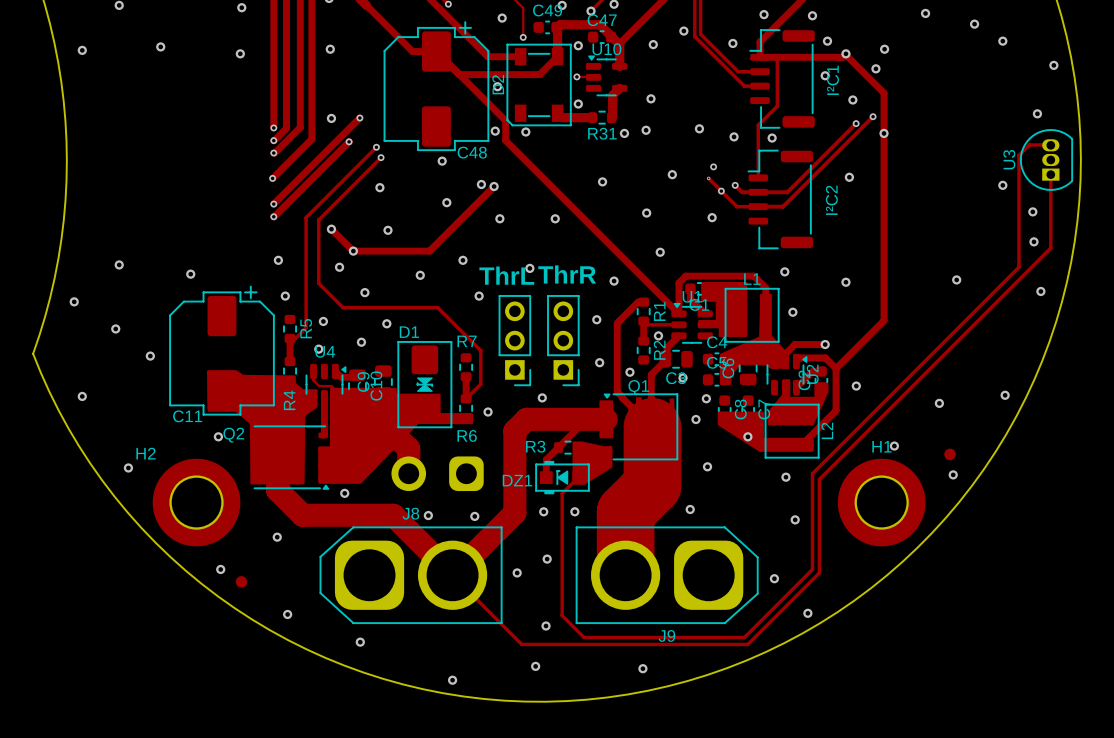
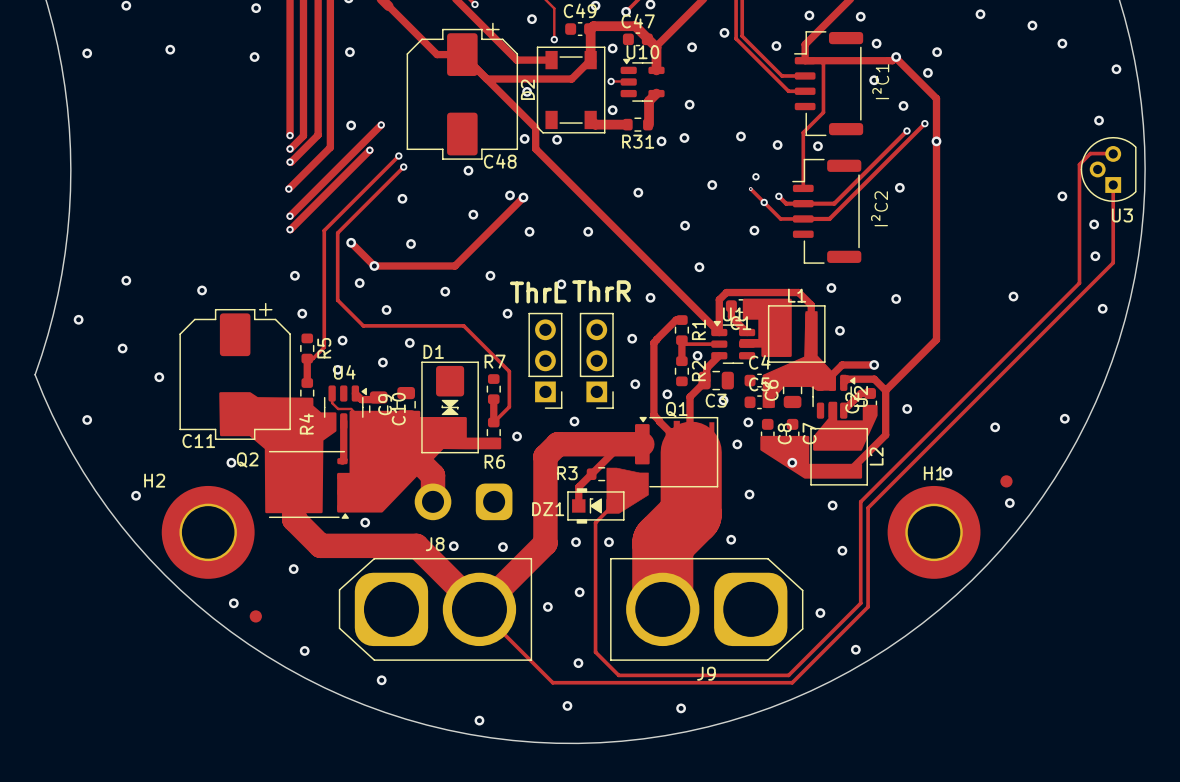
U3 footprint: [1020, 129, 1073, 191] -> [1080, 136, 1137, 202]
U3 name position: U3 (1009, 159) -> U3 (1122, 215)

